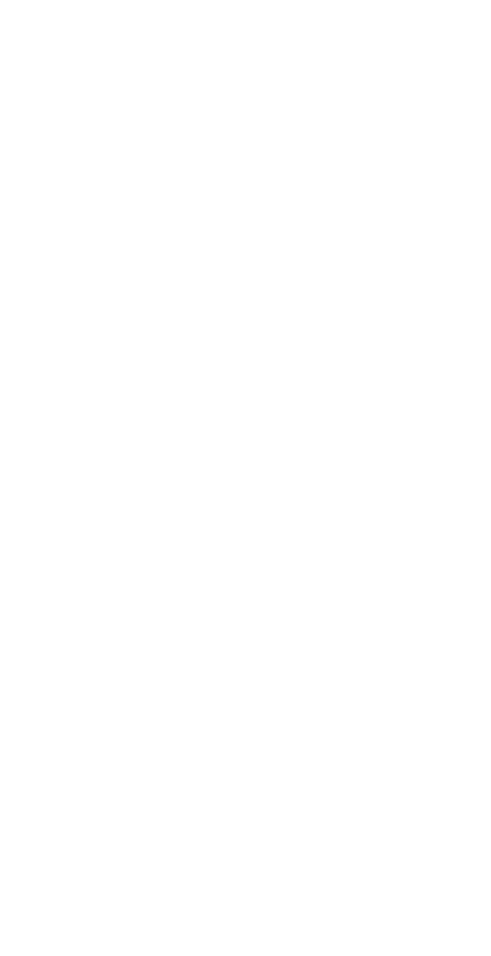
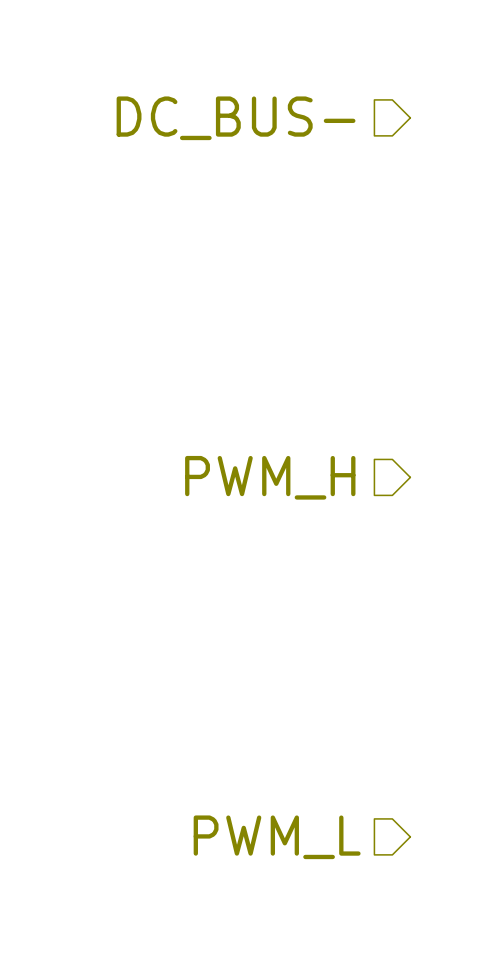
hierarchical label: none -> DC_BUS- (236, 118)
hierarchical label: none -> PWM_H (270, 477)
hierarchical label: none -> PWM_L (277, 837)

